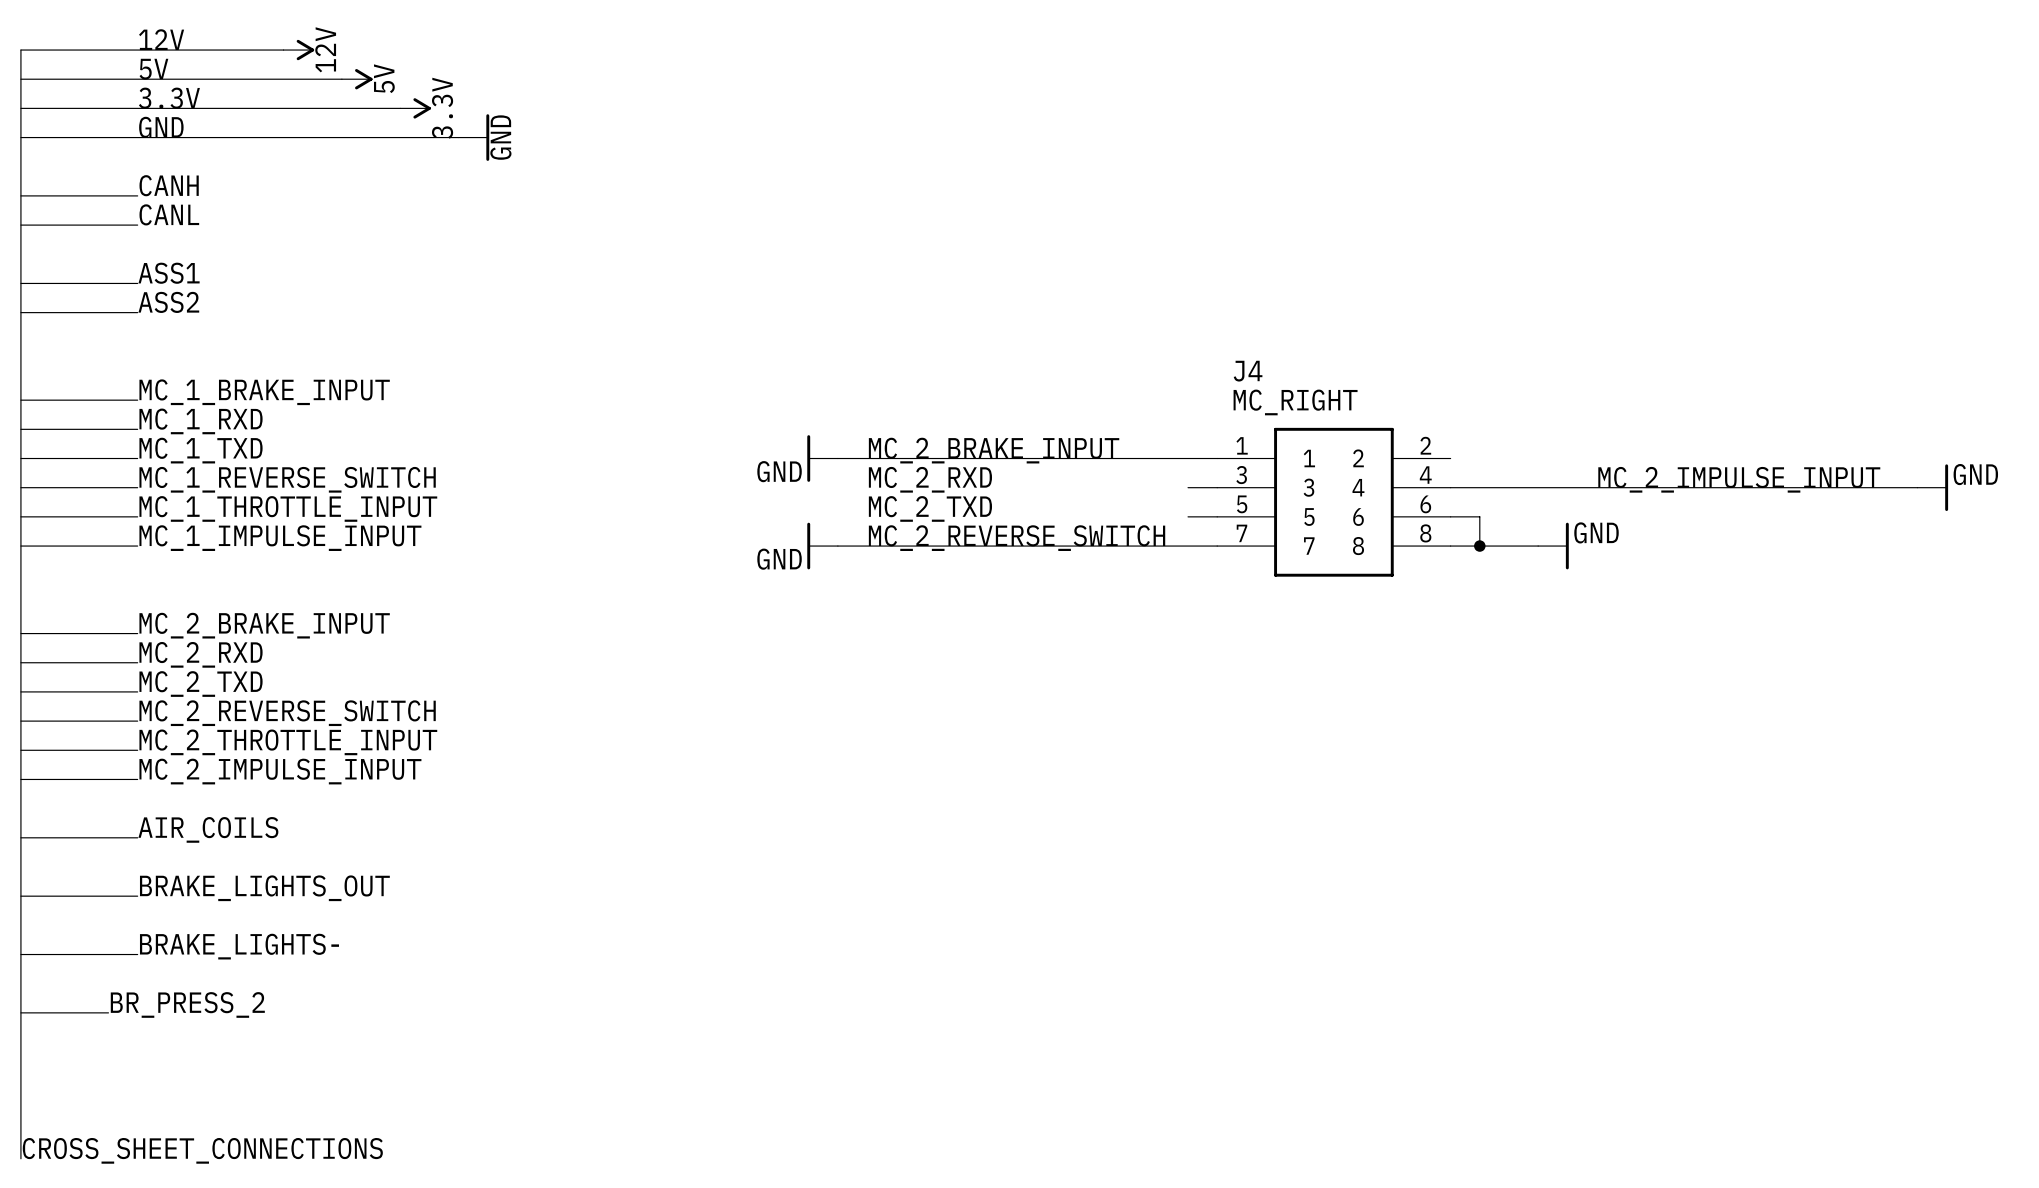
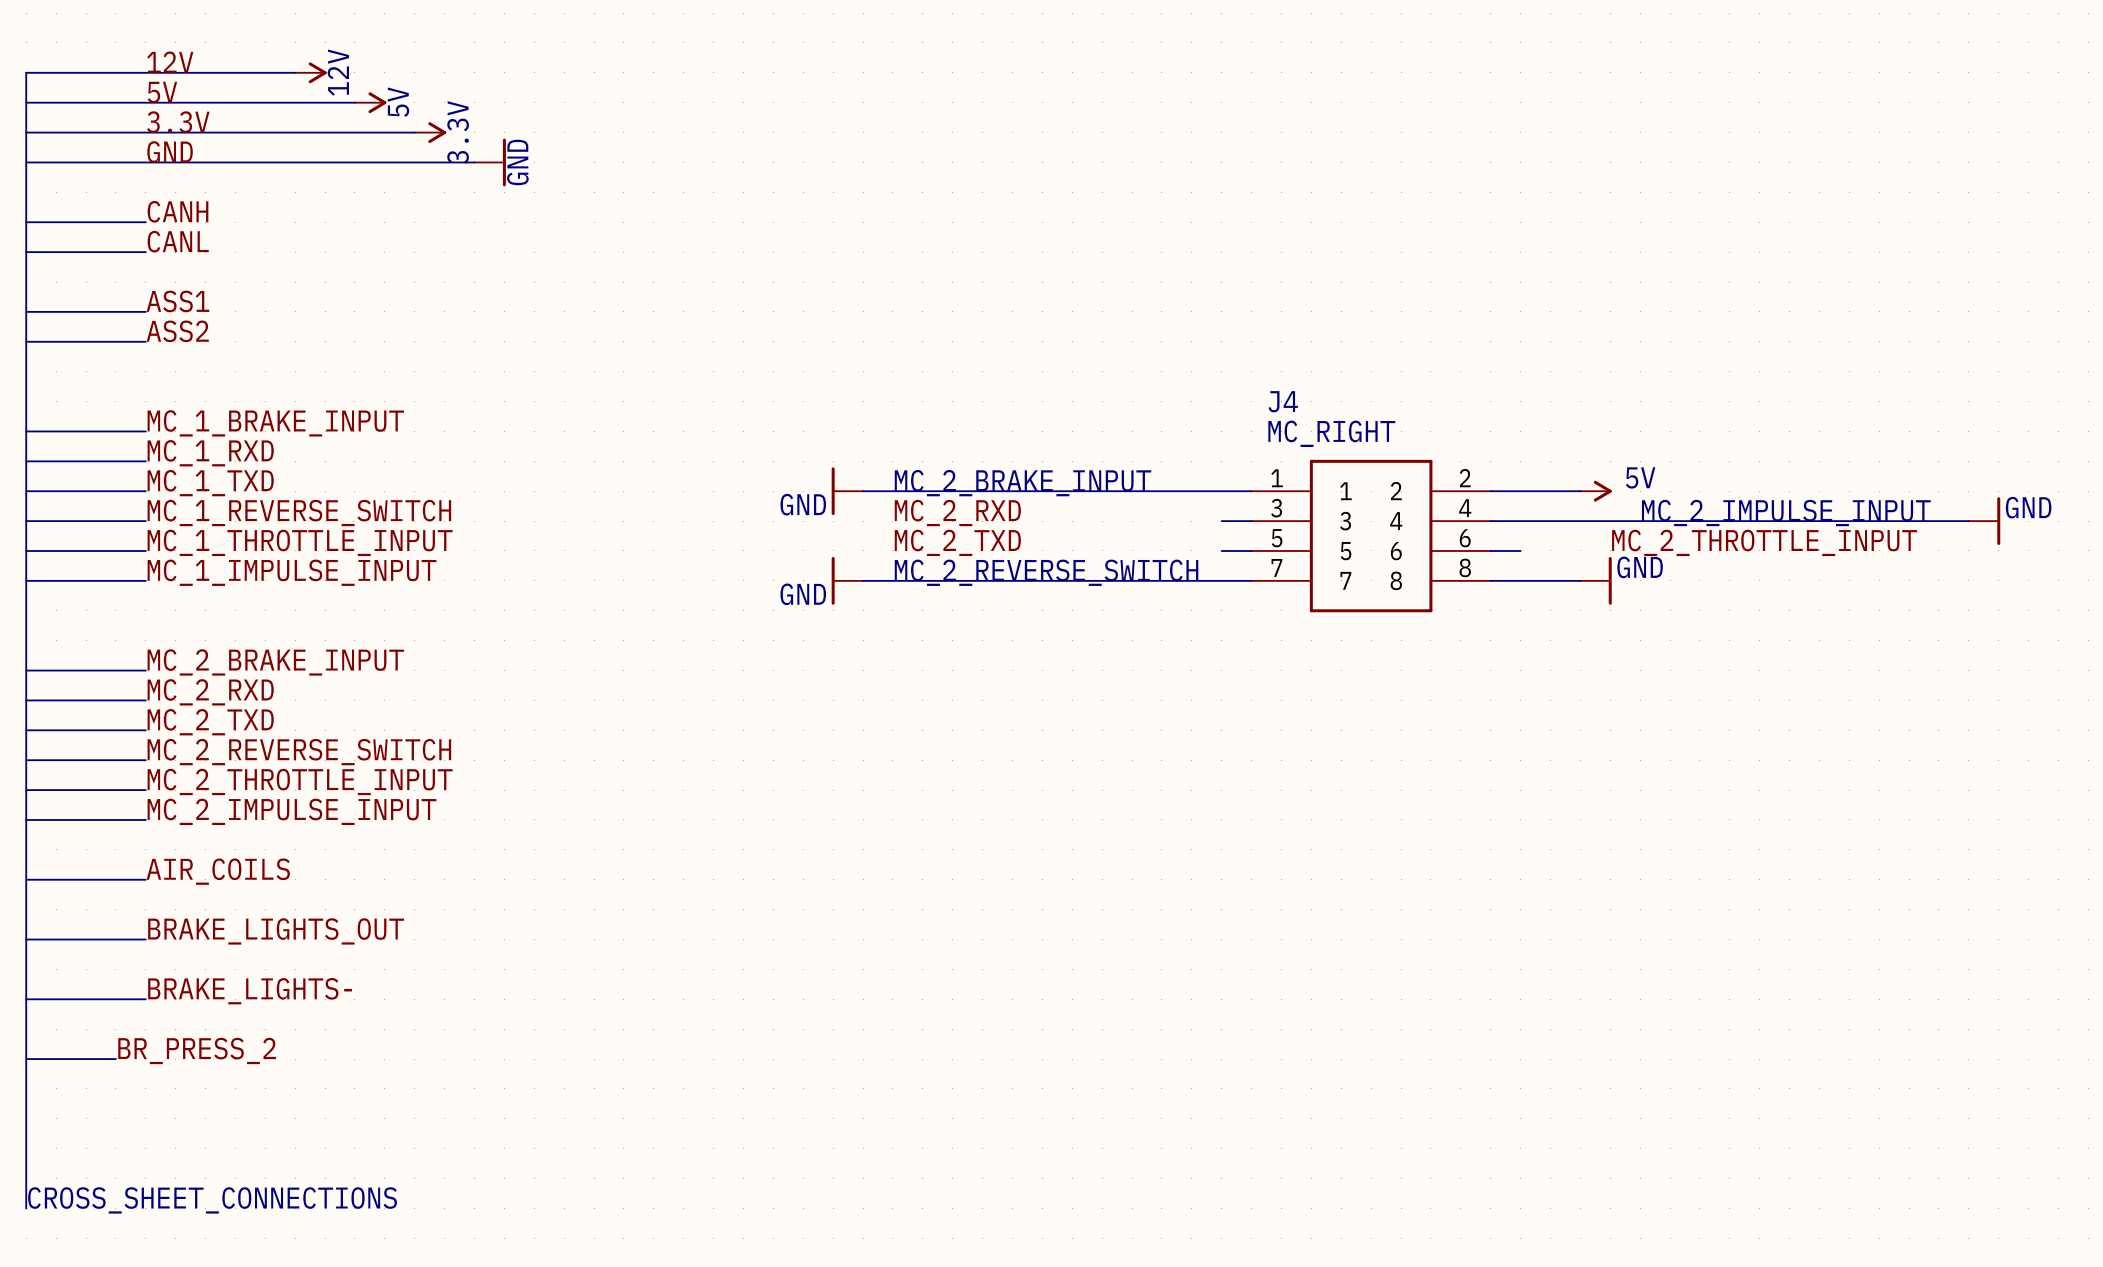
wire: none -> (1490, 491) (1580, 491)
power symbol: none -> 5V (1596, 491)
label: none -> MC_2_THROTTLE_INPUT (1764, 542)
wire: (1479, 516) (1479, 546) -> none
junction: (1479, 546) -> none

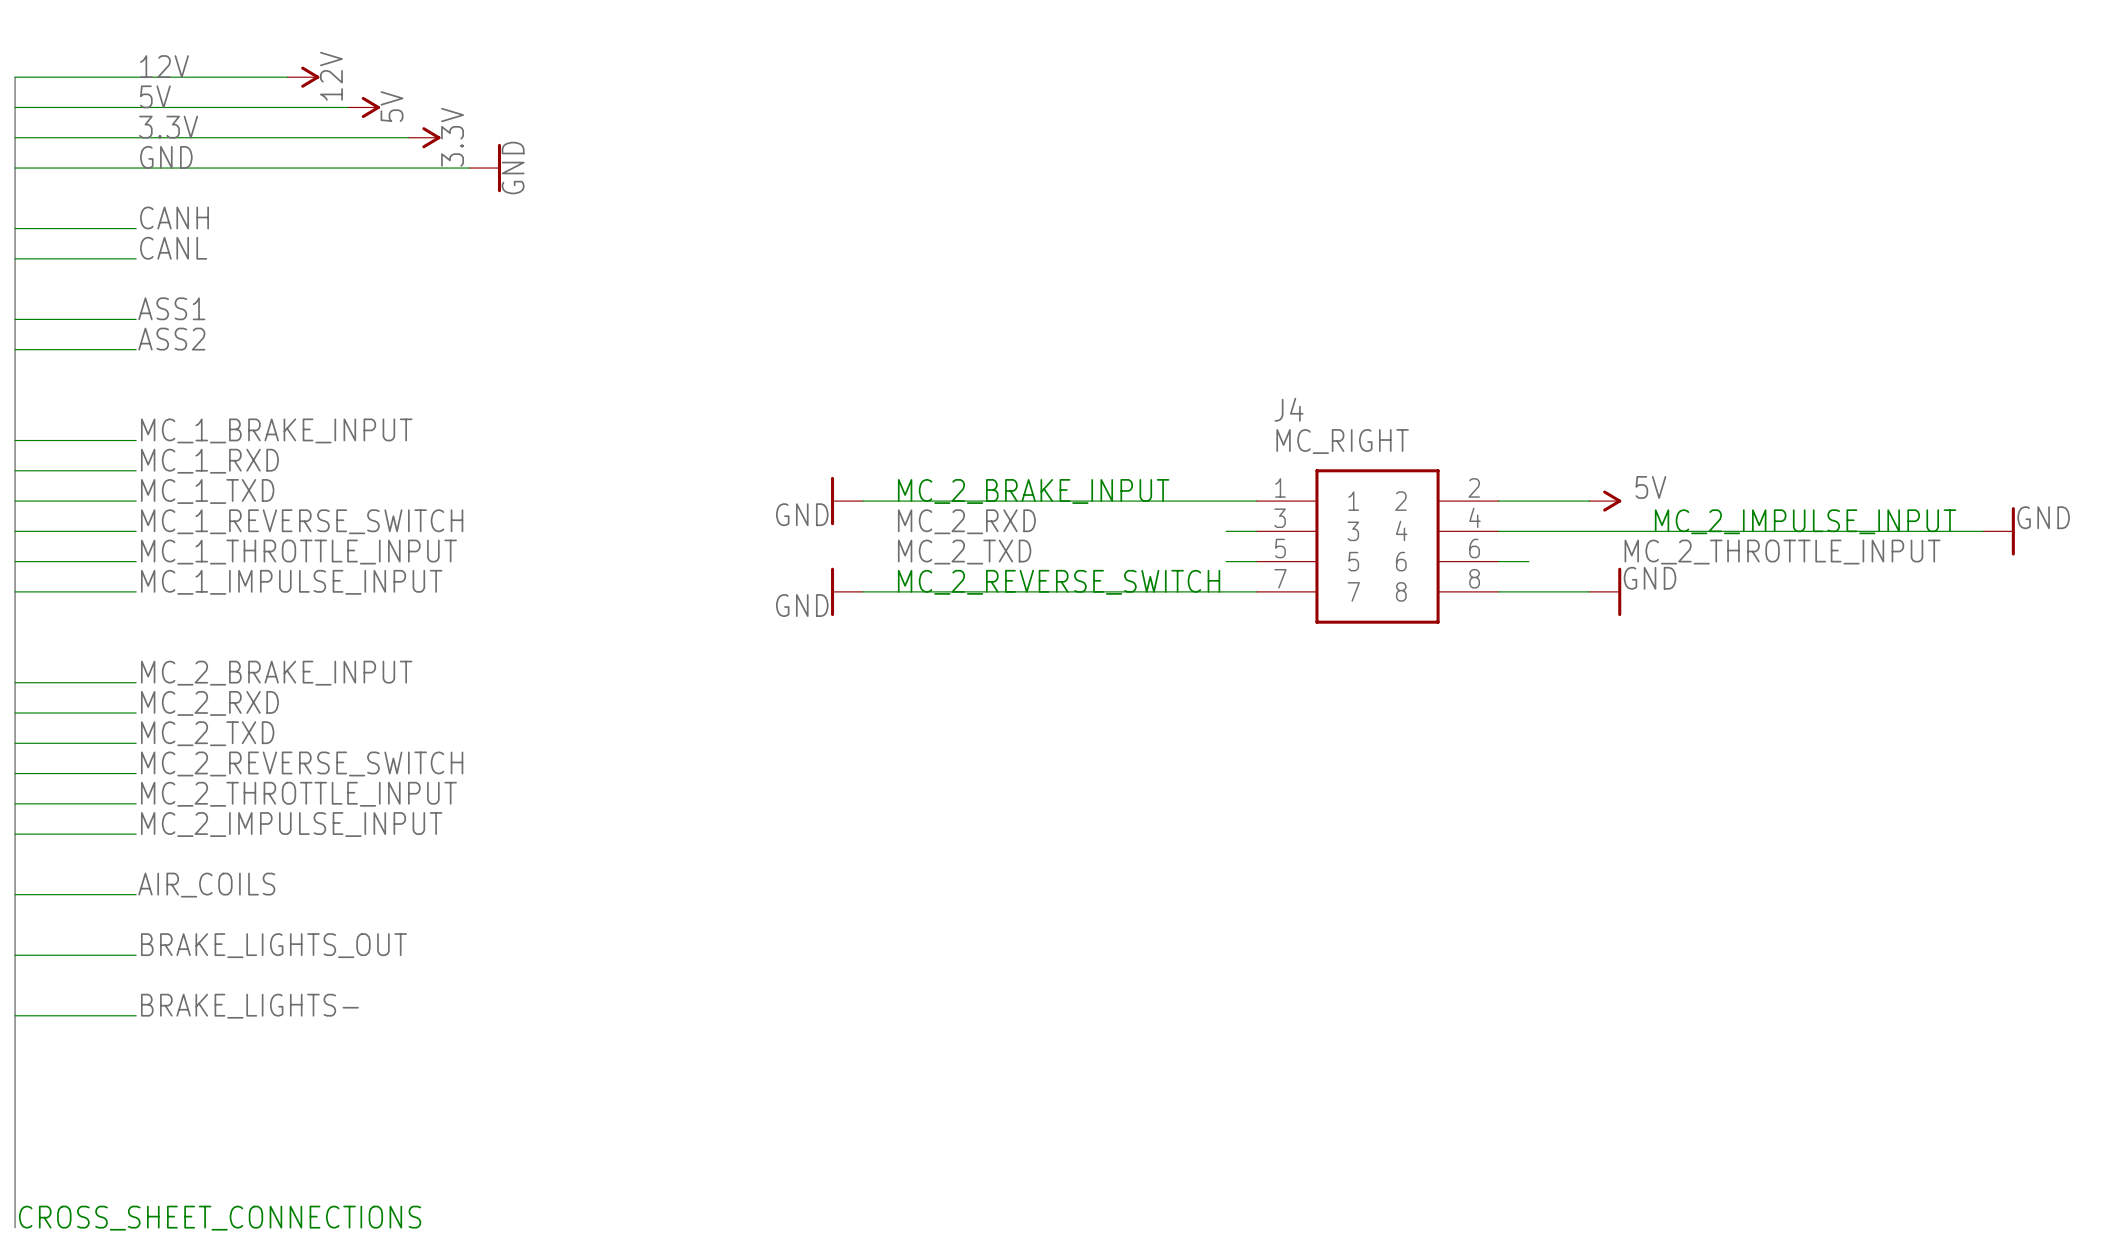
label: BR_PRESS_2 (197, 1050) -> none
wire: (26, 1059) (115, 1059) -> none

